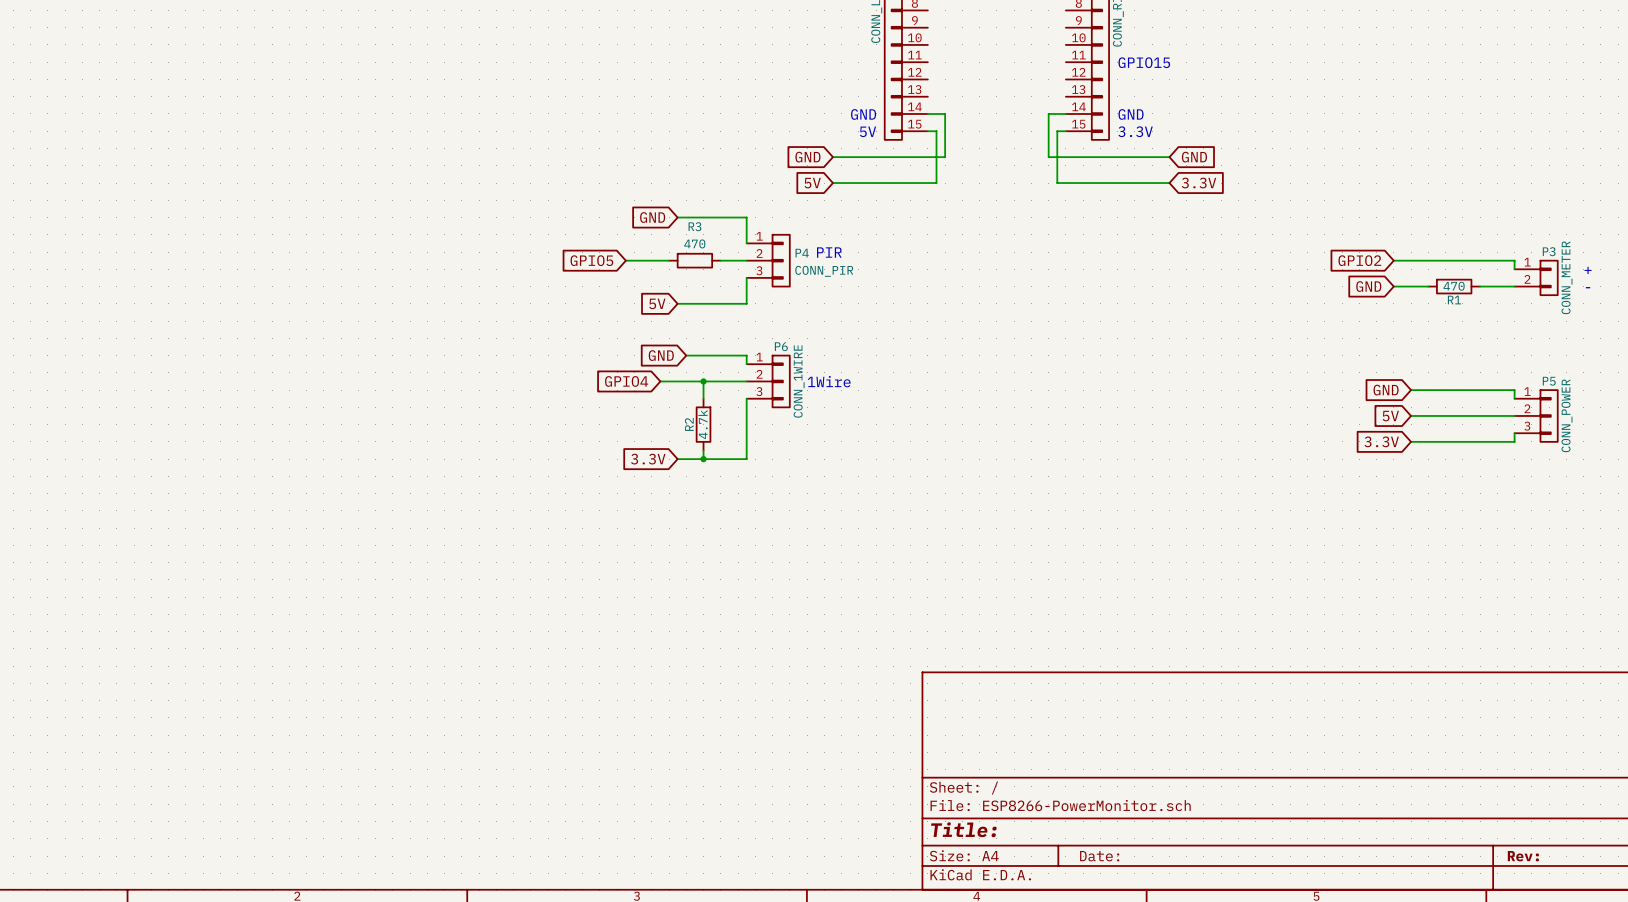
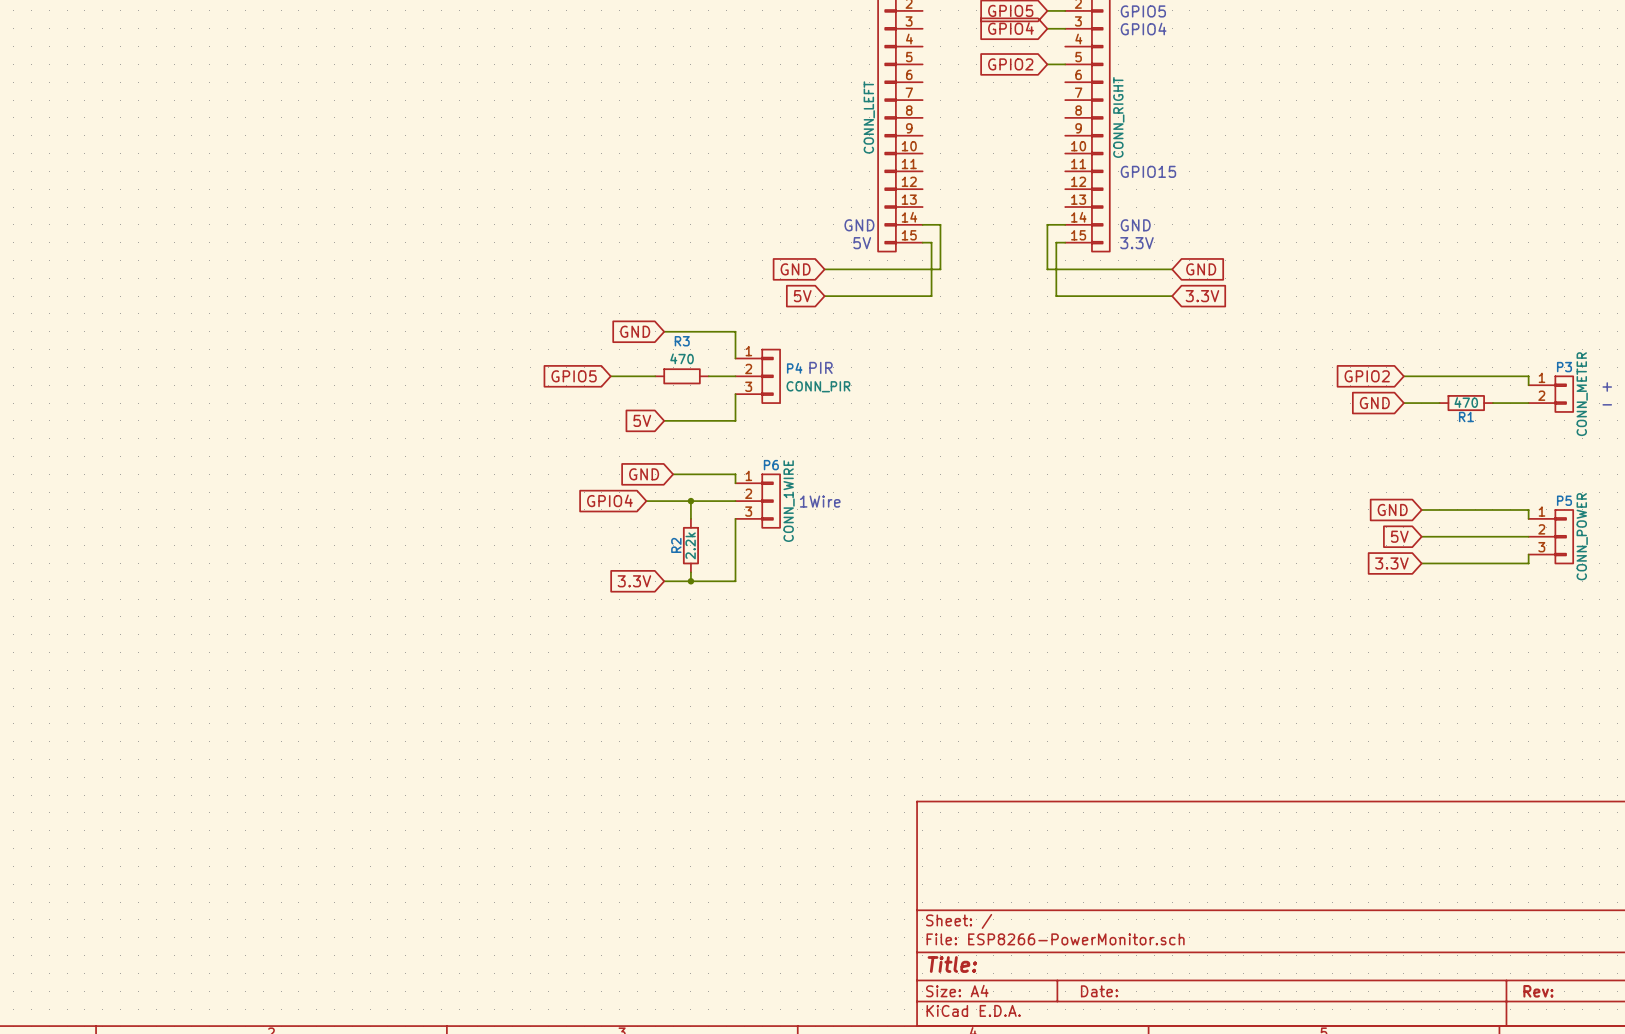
R2 value: 4.7k (703, 424) -> 2.2k (690, 545)

